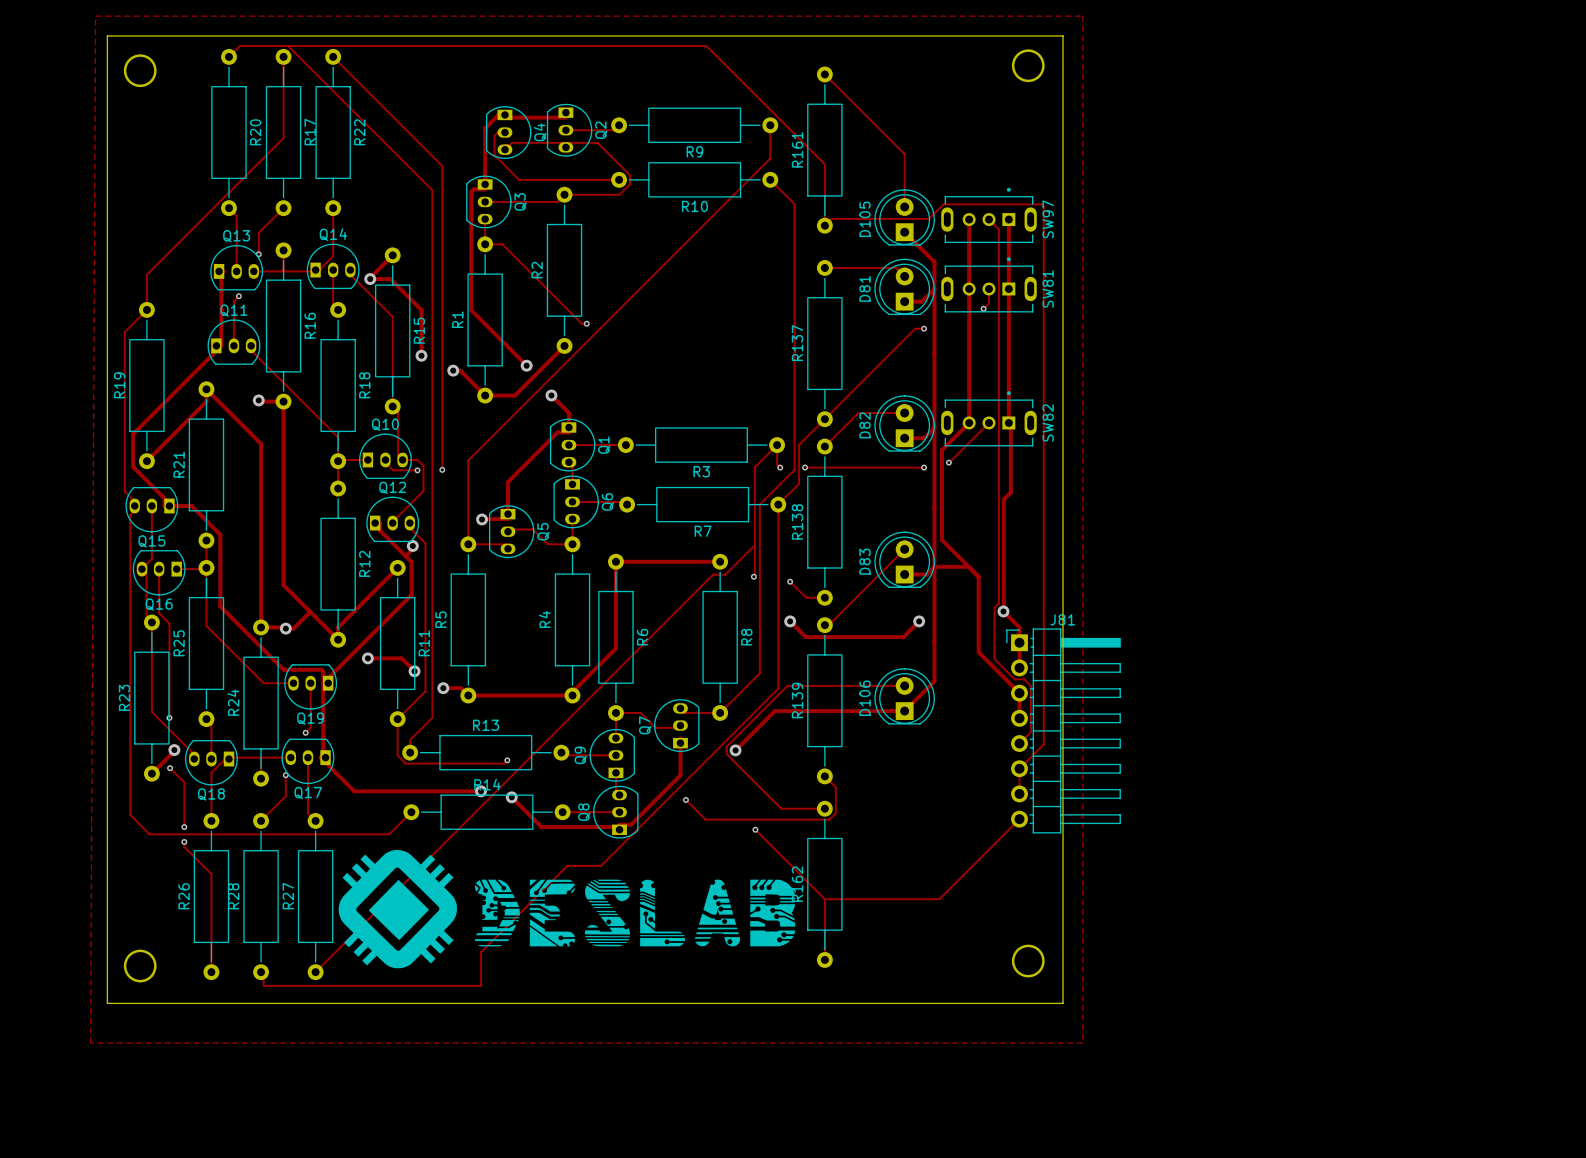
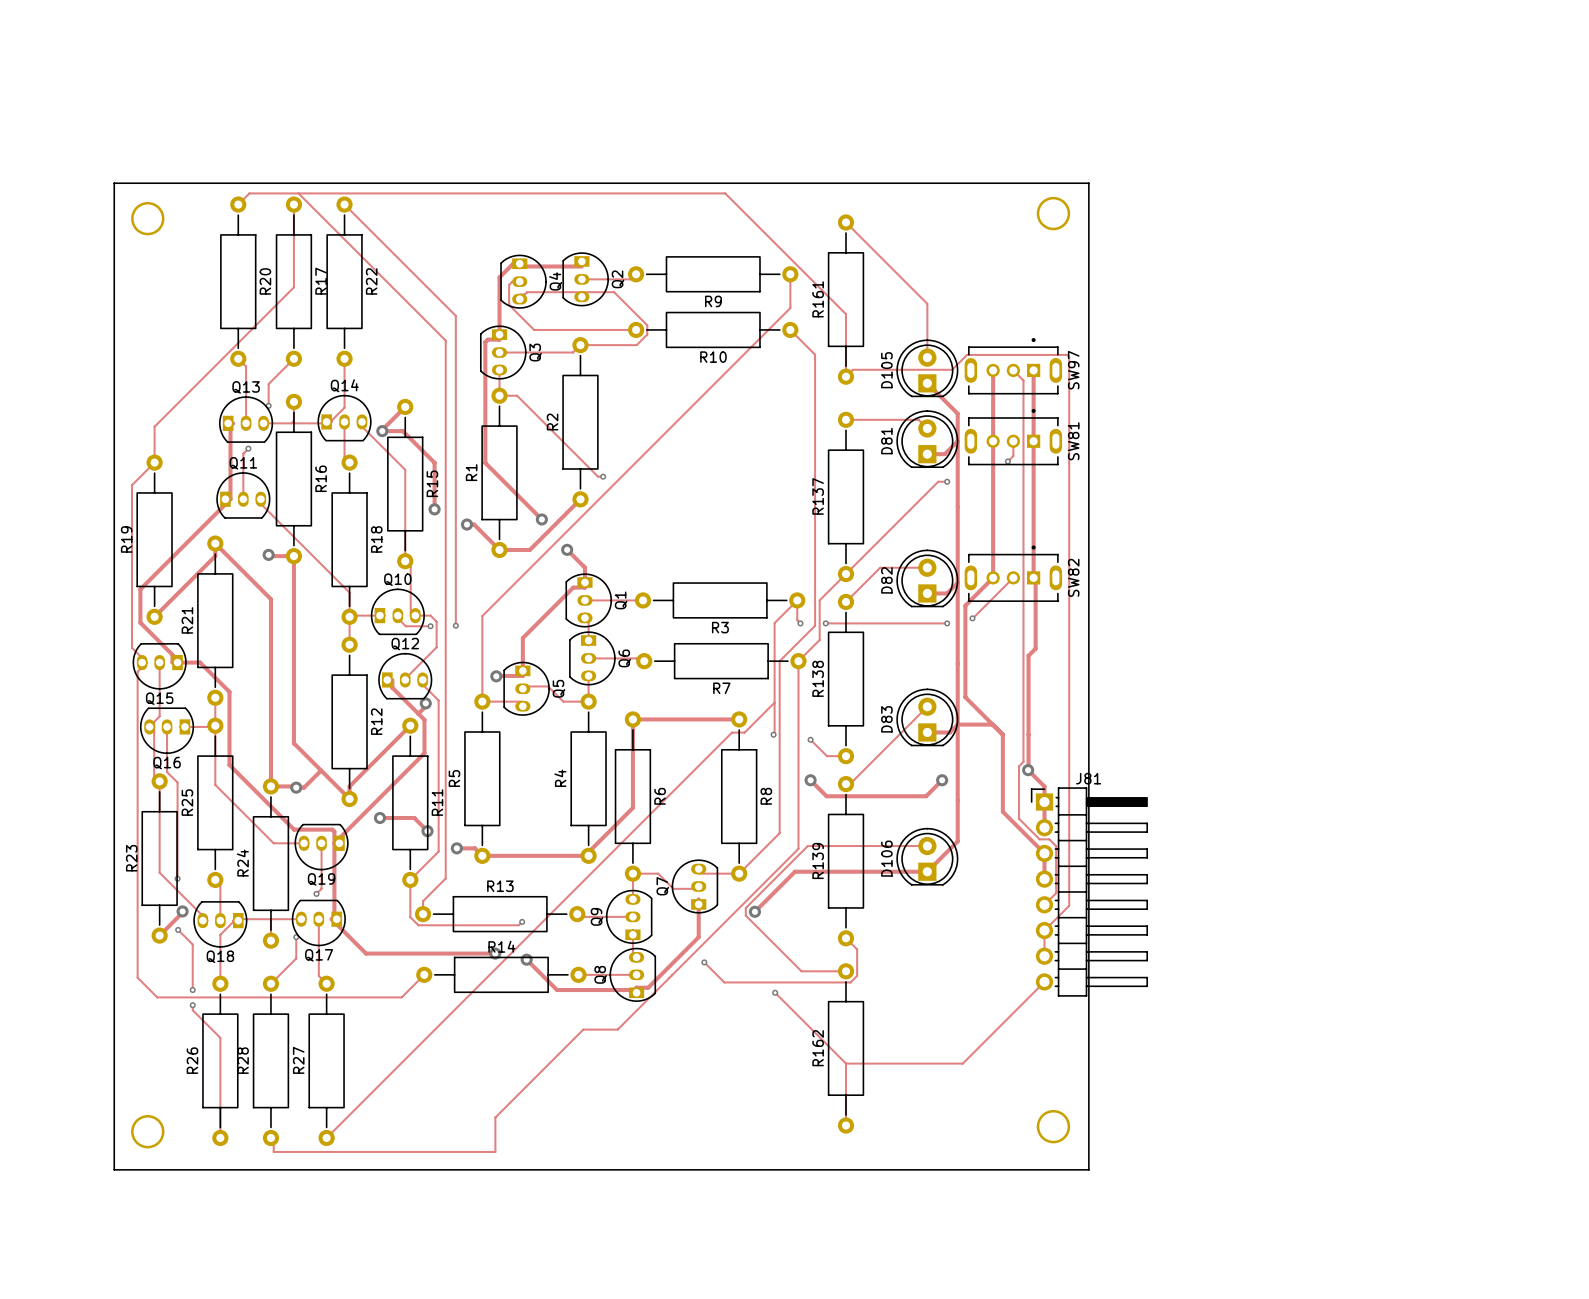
zone outline: (95, 16) (1082, 16) (1082, 1043) (90, 1043) (95, 16) -> none
drawing: [338, 849, 796, 969] -> none

